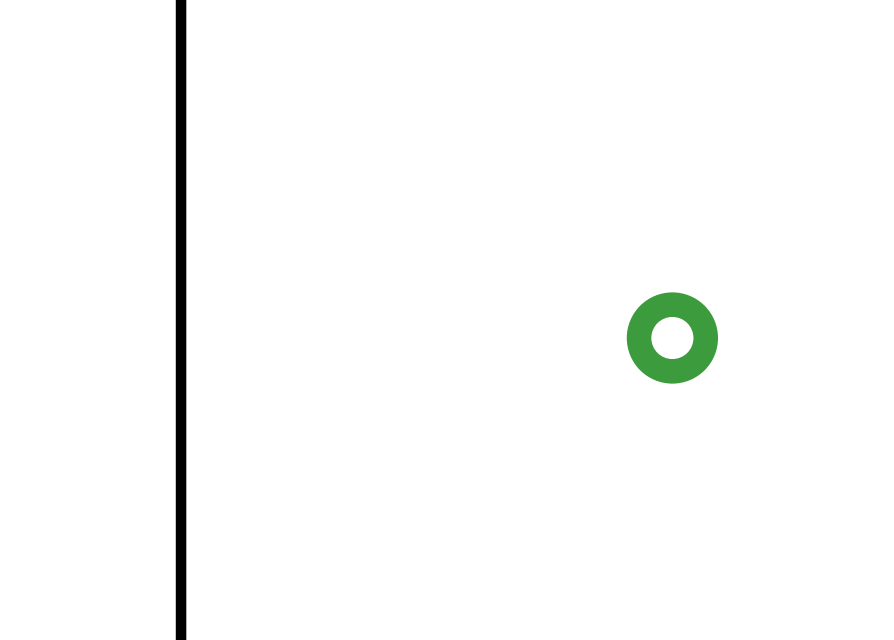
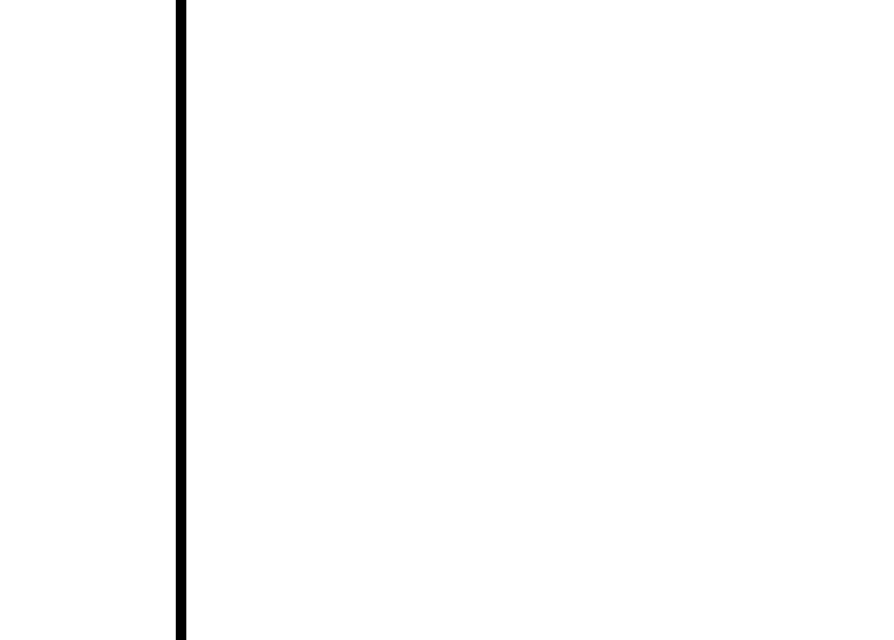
via: (672, 338) -> none

